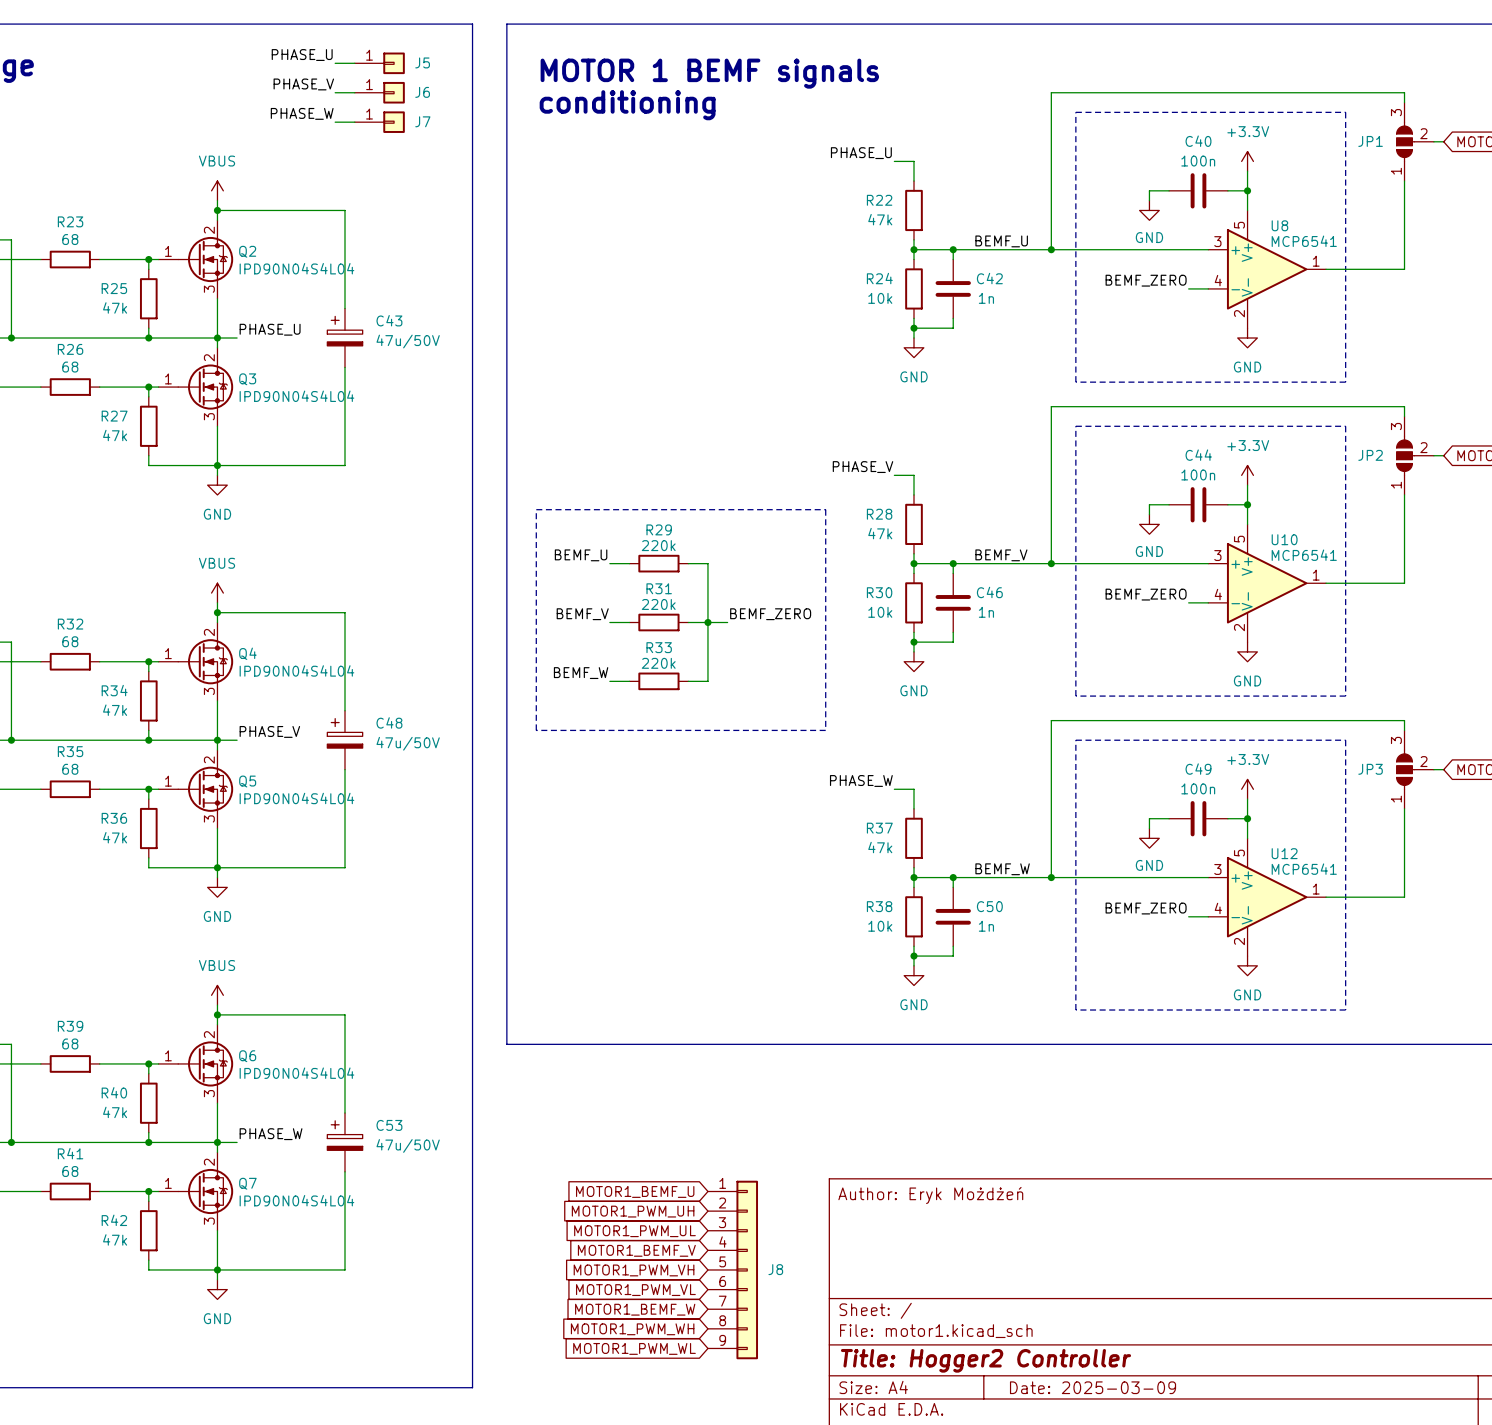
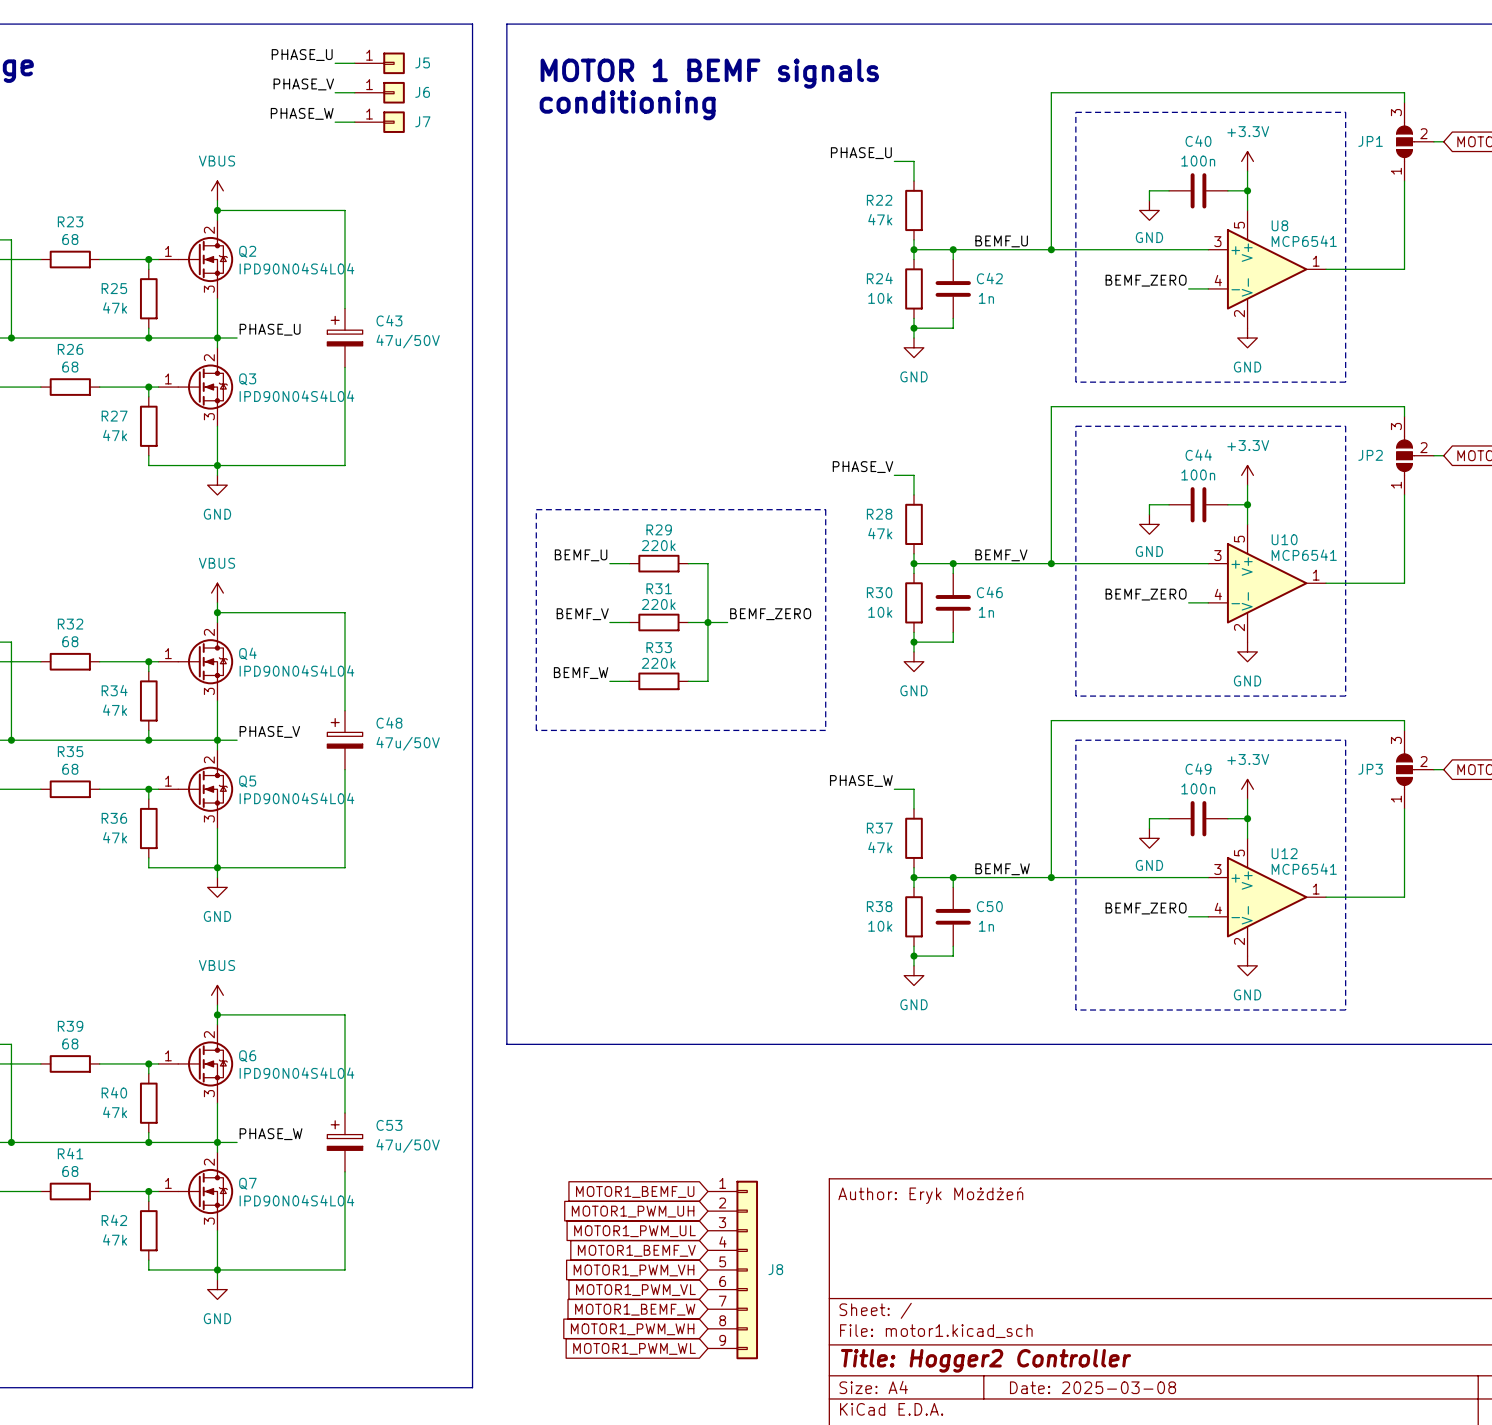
title block: Date: 2025-03-09 (1093, 1387) -> Date: 2025-03-08 (1093, 1387)

